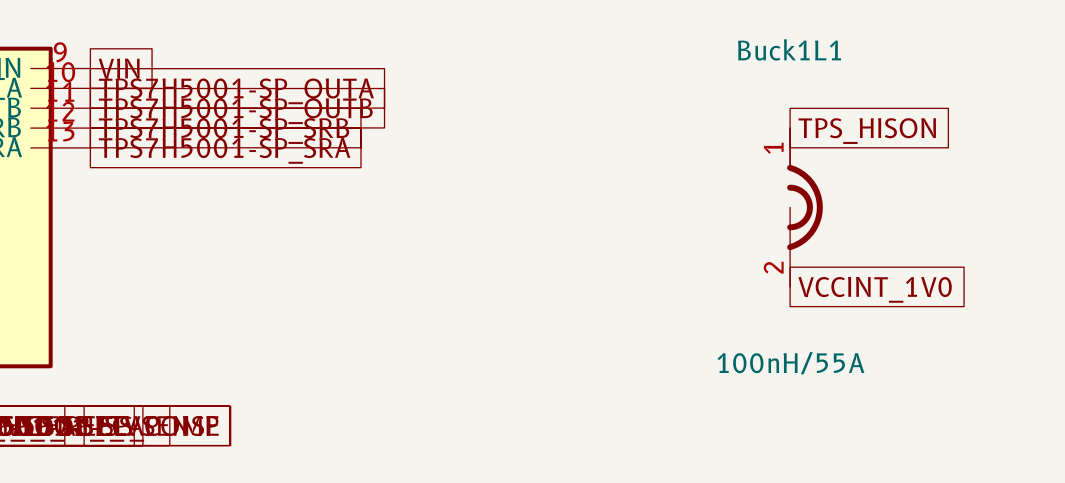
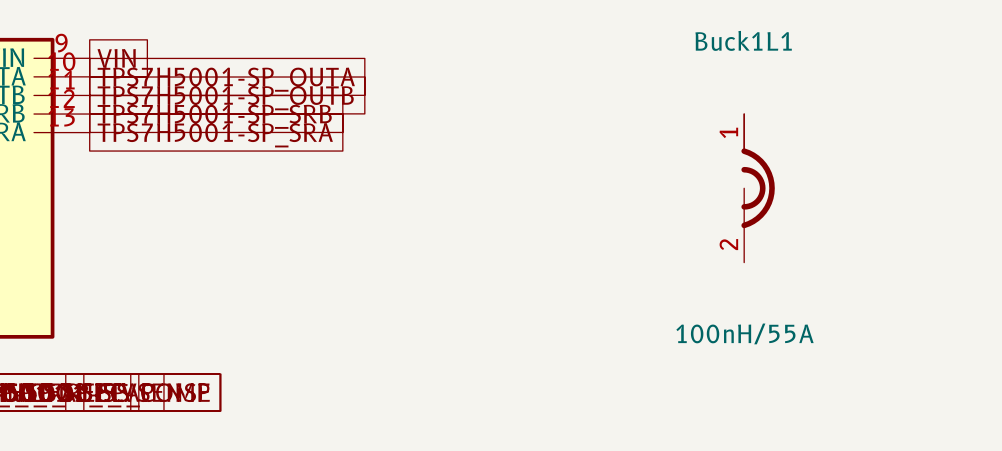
global label: TPS_HISON (867, 131) -> none
global label: VCCINT_1V0 (875, 289) -> none

